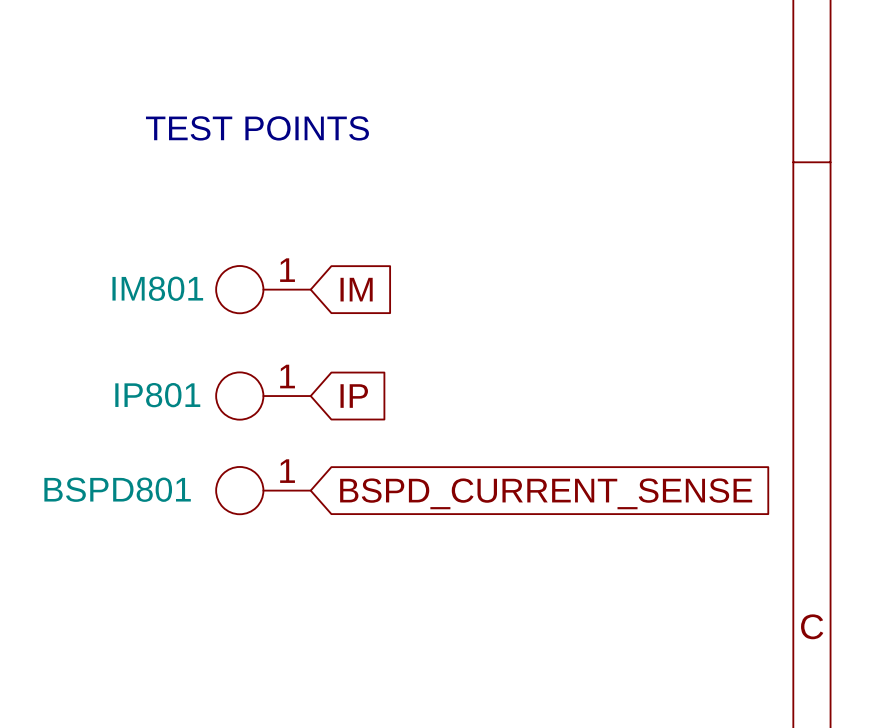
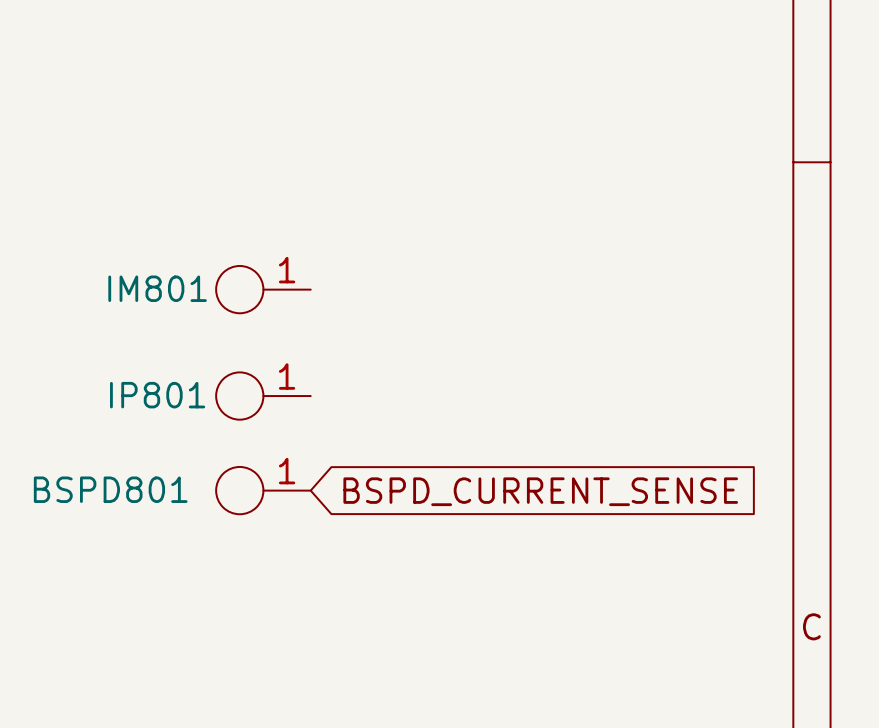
text: TEST POINTS (257, 128) -> none
global label: IM (356, 289) -> none
global label: IP (354, 396) -> none

